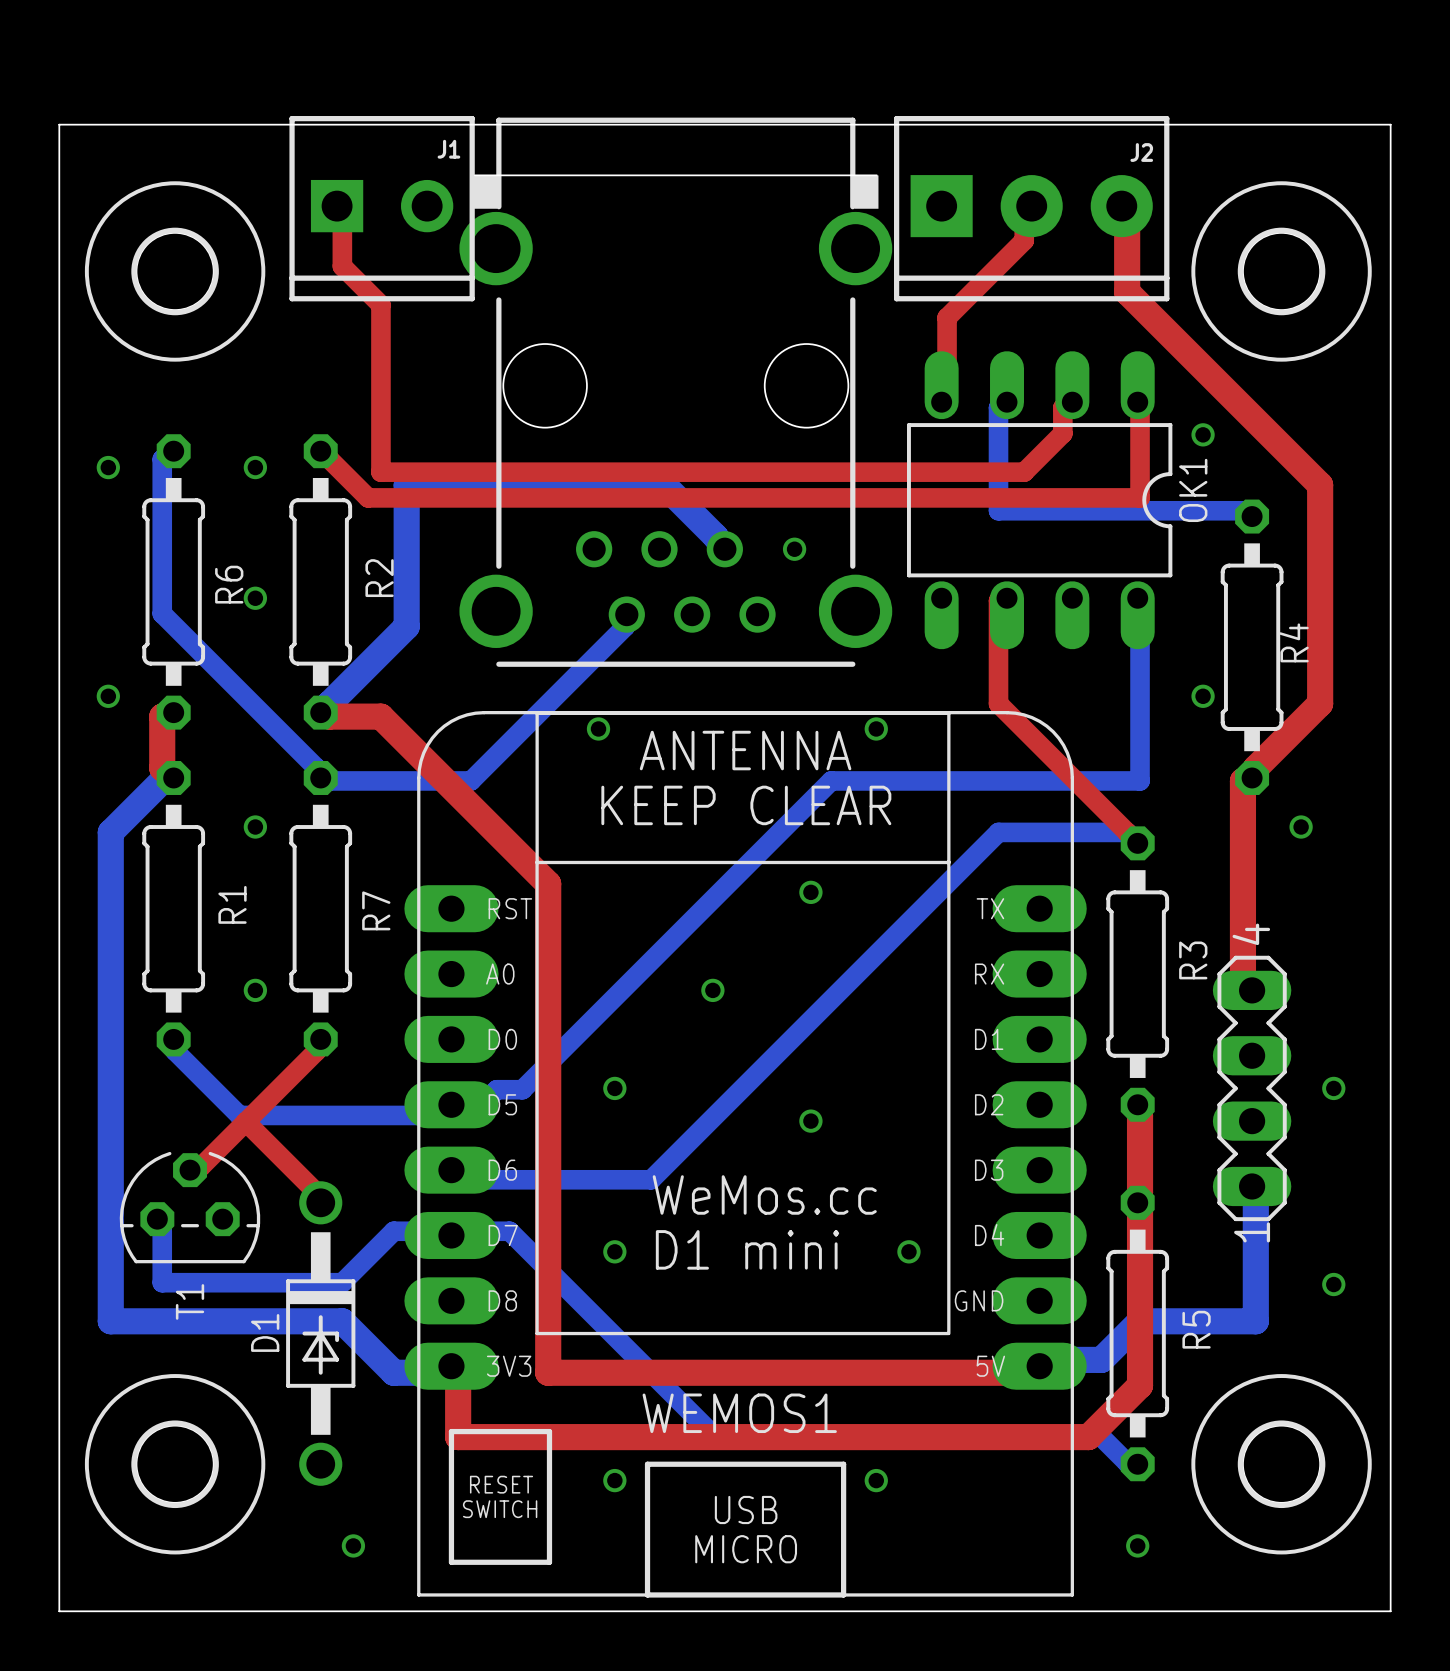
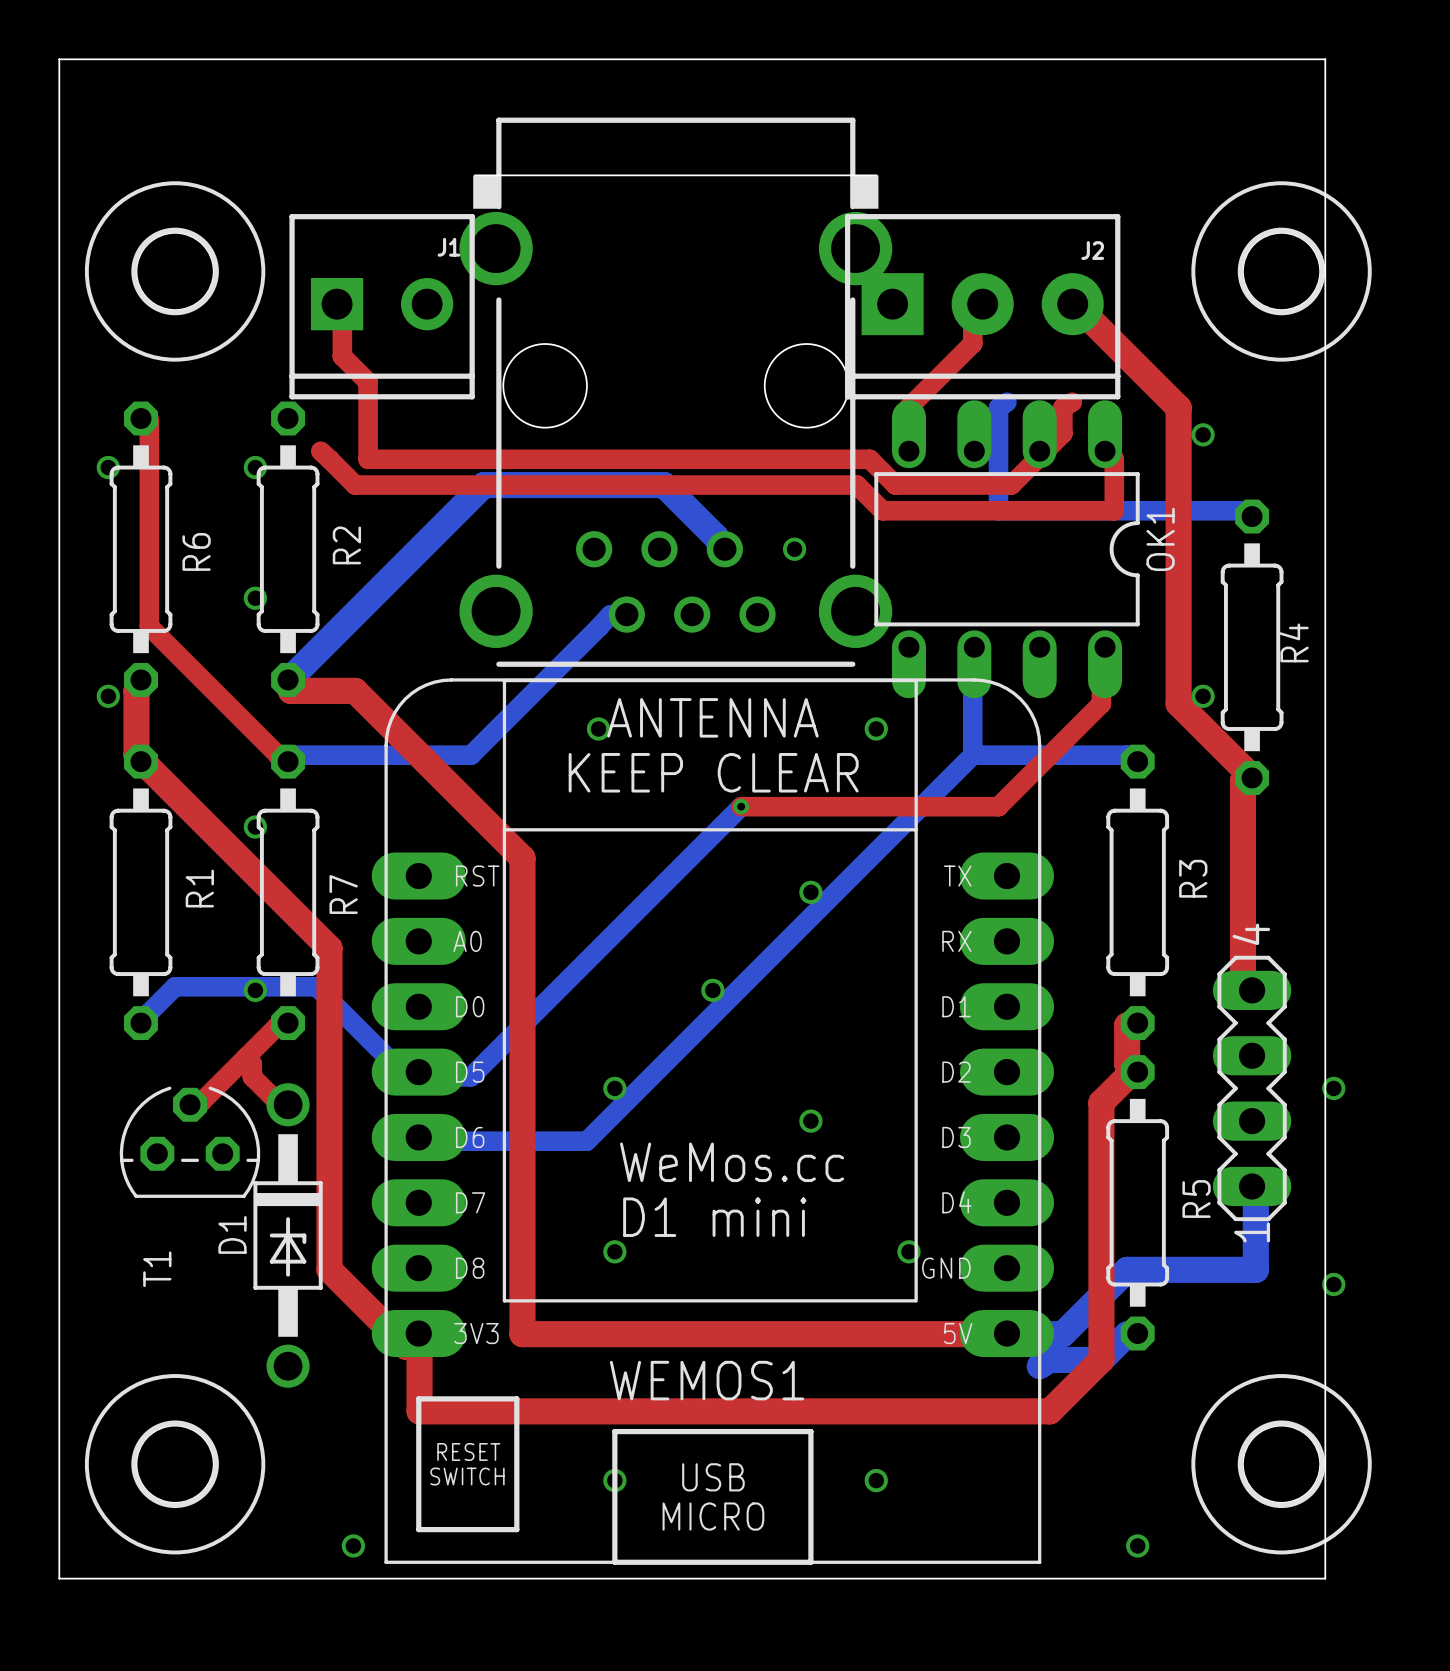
board edge: (59, 124) (1390, 124) (1390, 1611) (59, 1611) (59, 1578) -> (59, 124) (59, 59) (1325, 59) (1325, 1578) (59, 1578)
top track: (337, 206) (342, 214) (342, 266) (380, 304) (380, 472) (1024, 472) -> (337, 304) (342, 304) (342, 356) (368, 382) (368, 459) (869, 459) (895, 485) (1011, 485) (1024, 472)
top track: (1031, 206) (1024, 214) (1024, 240) (947, 317) (947, 394) (941, 402) -> none
top track: (1121, 206) (1127, 214) (1127, 292) (1320, 485) (1320, 703) (1255, 768) (1252, 777) -> (1072, 304) (1075, 304) (1178, 407) (1178, 703) (1252, 777)
J1 position: (382, 208) -> (382, 306)
J2 position: (1031, 208) -> (982, 306)
top track: none -> (982, 304) (972, 304) (972, 343) (908, 407) (908, 451)
top track: (1137, 402) (1140, 407) (1140, 497) (368, 497) (355, 485) -> (1105, 451) (1114, 459) (1114, 510) (882, 510) (856, 485) (355, 485)
top track: none -> (141, 418) (149, 420) (149, 626) (278, 755) (288, 761)
bottom track: (173, 451) (162, 459) (162, 613) (316, 768) (320, 777) (329, 780) (471, 780) (625, 626) (626, 614) -> none
bottom track: (483, 485) (406, 485) (406, 626) (320, 712) -> (483, 485) (288, 679)
OK1 position: (1039, 500) -> (1007, 549)
R6 position: (173, 581) -> (141, 549)
R2 position: (320, 581) -> (288, 549)
top track: (1007, 598) (998, 600) (998, 703) (1137, 843) -> none
bottom track: (1137, 598) (1140, 600) (1140, 780) (831, 780) (522, 1089) (496, 1089) (483, 1102) (458, 1102) (451, 1104) (445, 1115) (239, 1115) (175, 1051) (173, 1039) -> none
bottom track: none -> (610, 614) (471, 755) (290, 755) (288, 761)
bottom track: none -> (974, 647) (972, 755)
top track: none -> (1105, 647) (1101, 652) (1101, 703) (998, 806) (741, 806)
top track: none -> (141, 679) (136, 690) (136, 755) (141, 761) (329, 948) (329, 1269) (406, 1347) (419, 1334) (419, 1411) (1049, 1411) (1101, 1359) (1101, 1102) (1127, 1076) (1137, 1072) (1127, 1063) (1127, 1025) (1137, 1023)
top track: (173, 712) (162, 716) (162, 768) (173, 777) -> none
top track: (320, 712) (329, 716) (380, 716) -> (288, 679) (290, 690) (355, 690) (380, 716)
bottom track: none -> (972, 755) (1127, 755) (1137, 761)
bottom track: none -> (972, 755) (586, 1141) (419, 1141) (418, 1137)
bottom track: (173, 777) (162, 780) (110, 832) (110, 1321) (342, 1321) (393, 1372) (445, 1372) (451, 1366) -> none
bottom track: none -> (741, 806) (471, 1076) (419, 1076) (418, 1072) (406, 1063) (393, 1063) (316, 986) (175, 986) (141, 1023)
via: none -> (741, 806)
via: (1301, 827) -> none
bottom track: (1137, 843) (1127, 832) (998, 832) (651, 1179) (458, 1179) (451, 1170) -> none
top track: (522, 858) (548, 883) (548, 1372) (1037, 1372) (1039, 1366) -> (522, 858) (522, 1334) (1007, 1333)
R1 position: (173, 908) -> (141, 892)
R7 position: (320, 908) -> (288, 892)
R3 position: (1137, 974) -> (1137, 892)
top track: none -> (288, 1023) (278, 1025) (200, 1102) (190, 1104)
top track: (320, 1039) (316, 1051) (200, 1166) (190, 1170) -> none
top track: none -> (245, 1057) (252, 1063) (252, 1076) (278, 1102) (288, 1104)
top track: (1137, 1104) (1140, 1115) (1140, 1192) (1137, 1202) (1140, 1205) (1140, 1385) (1088, 1437) (458, 1437) (458, 1372) (451, 1366) -> none
top track: (245, 1121) (316, 1192) (320, 1202) -> none
WEMOS1 position: (745, 1154) -> (712, 1121)
T1 position: (189, 1207) -> (189, 1142)
bottom track: (157, 1219) (162, 1231) (162, 1282) (342, 1282) (393, 1231) (445, 1231) (451, 1235) (458, 1231) (509, 1231) (715, 1437) (1101, 1437) (1127, 1462) (1137, 1464) -> none
bottom track: (1255, 1269) (1255, 1321) (1140, 1321) (1127, 1334) -> (1255, 1269) (1127, 1269) (1062, 1334) (1007, 1333)
T1 name position: T1 (190, 1301) -> T1 (157, 1269)
D1 position: (320, 1333) -> (288, 1235)
R5 position: (1137, 1333) -> (1137, 1202)

